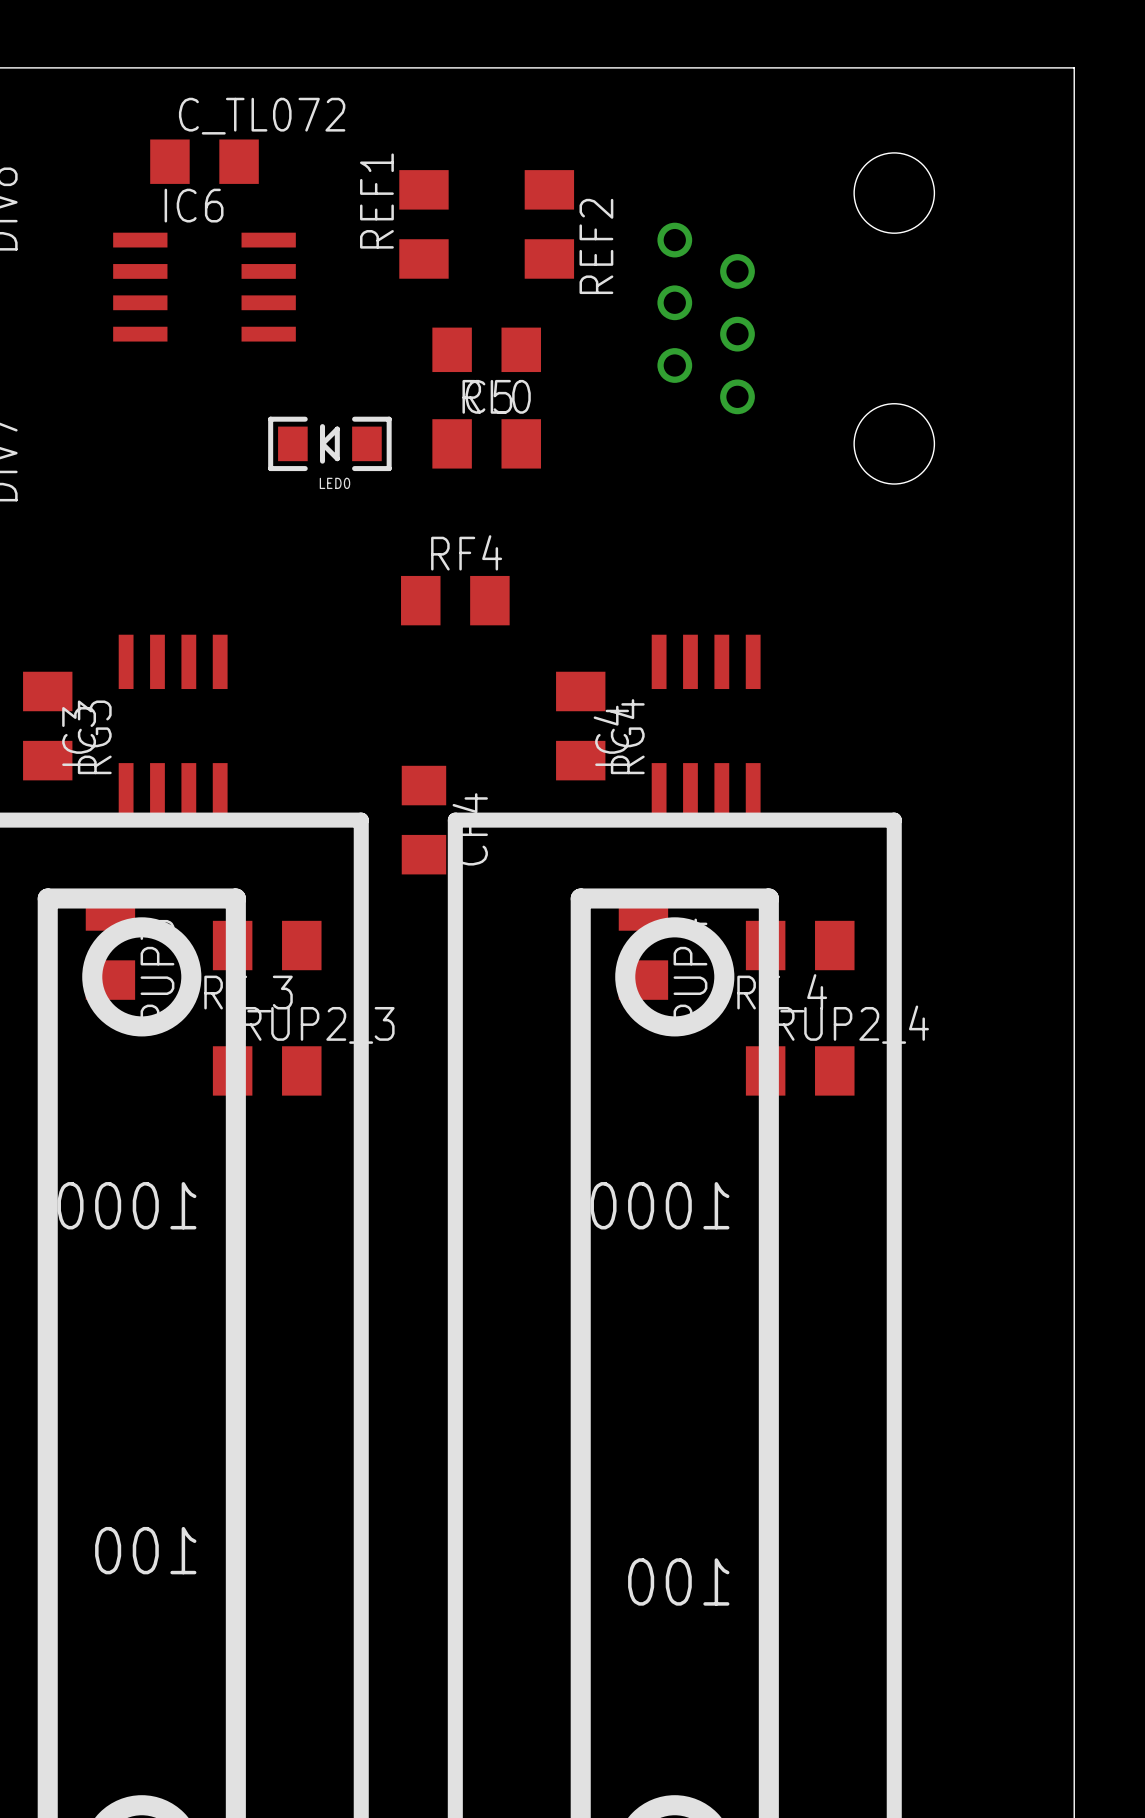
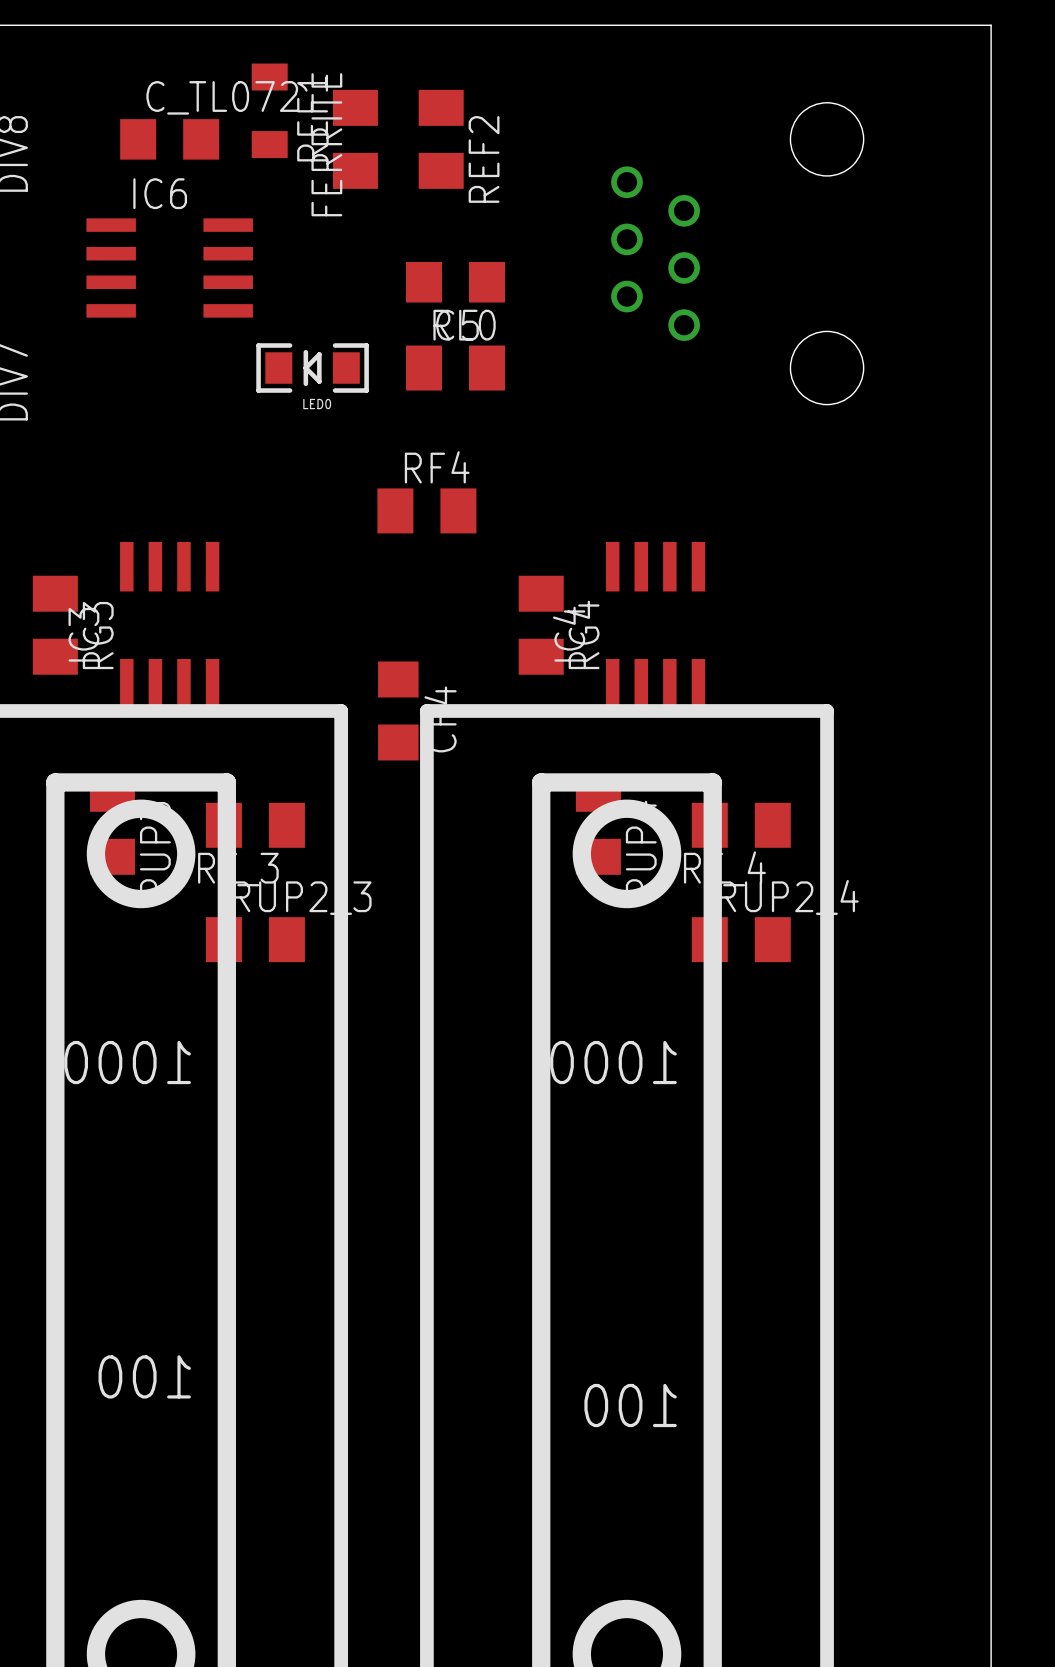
C_TL072 position: (204, 161) -> (169, 139)
FERRITE: none -> (269, 110)
REF1 position: (423, 224) -> (355, 139)
REF2 position: (549, 224) -> (441, 139)
IC6 position: (204, 287) -> (169, 267)

